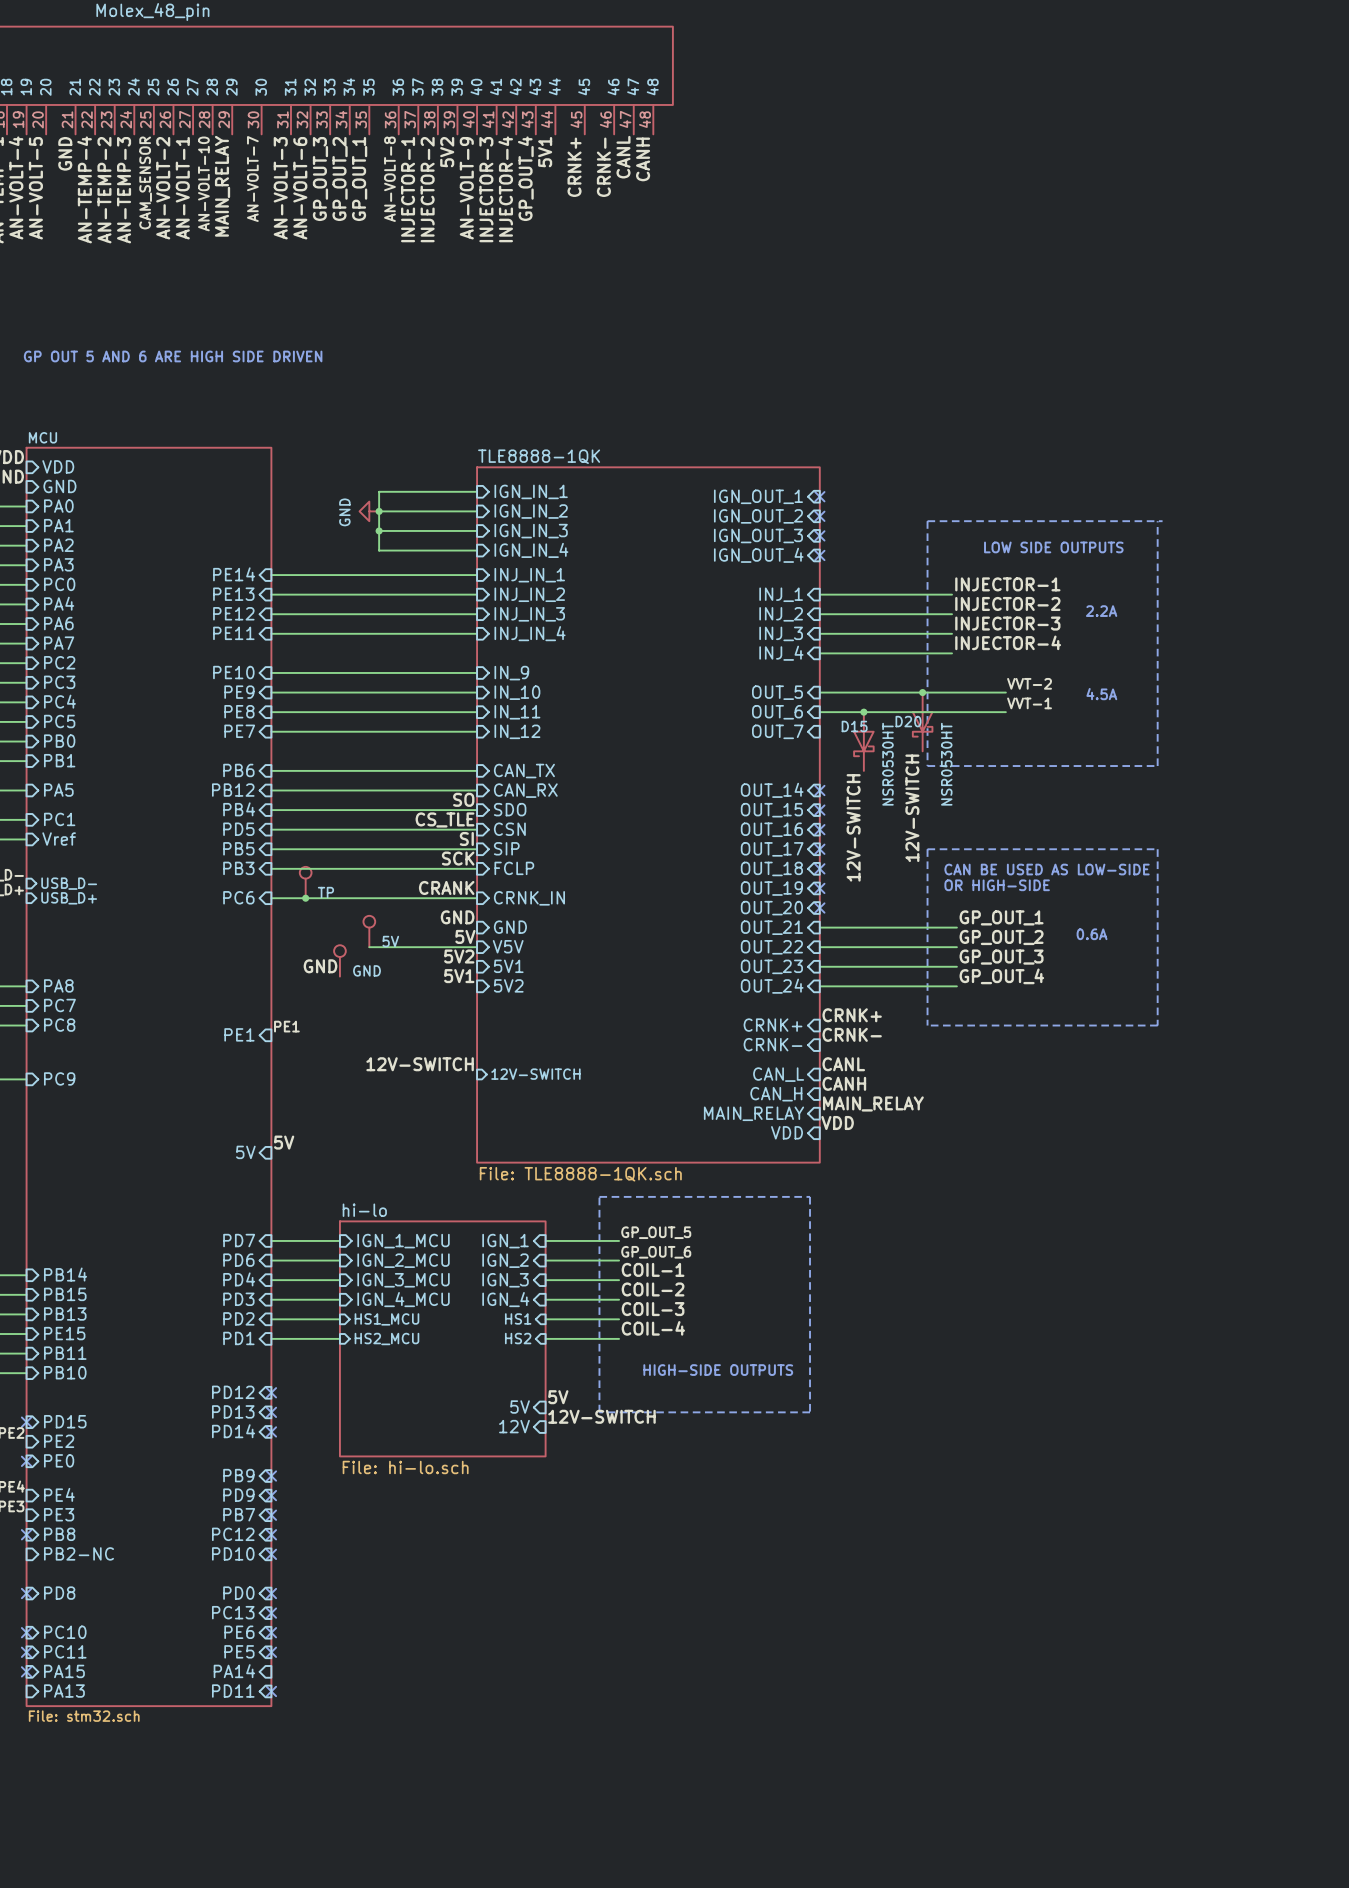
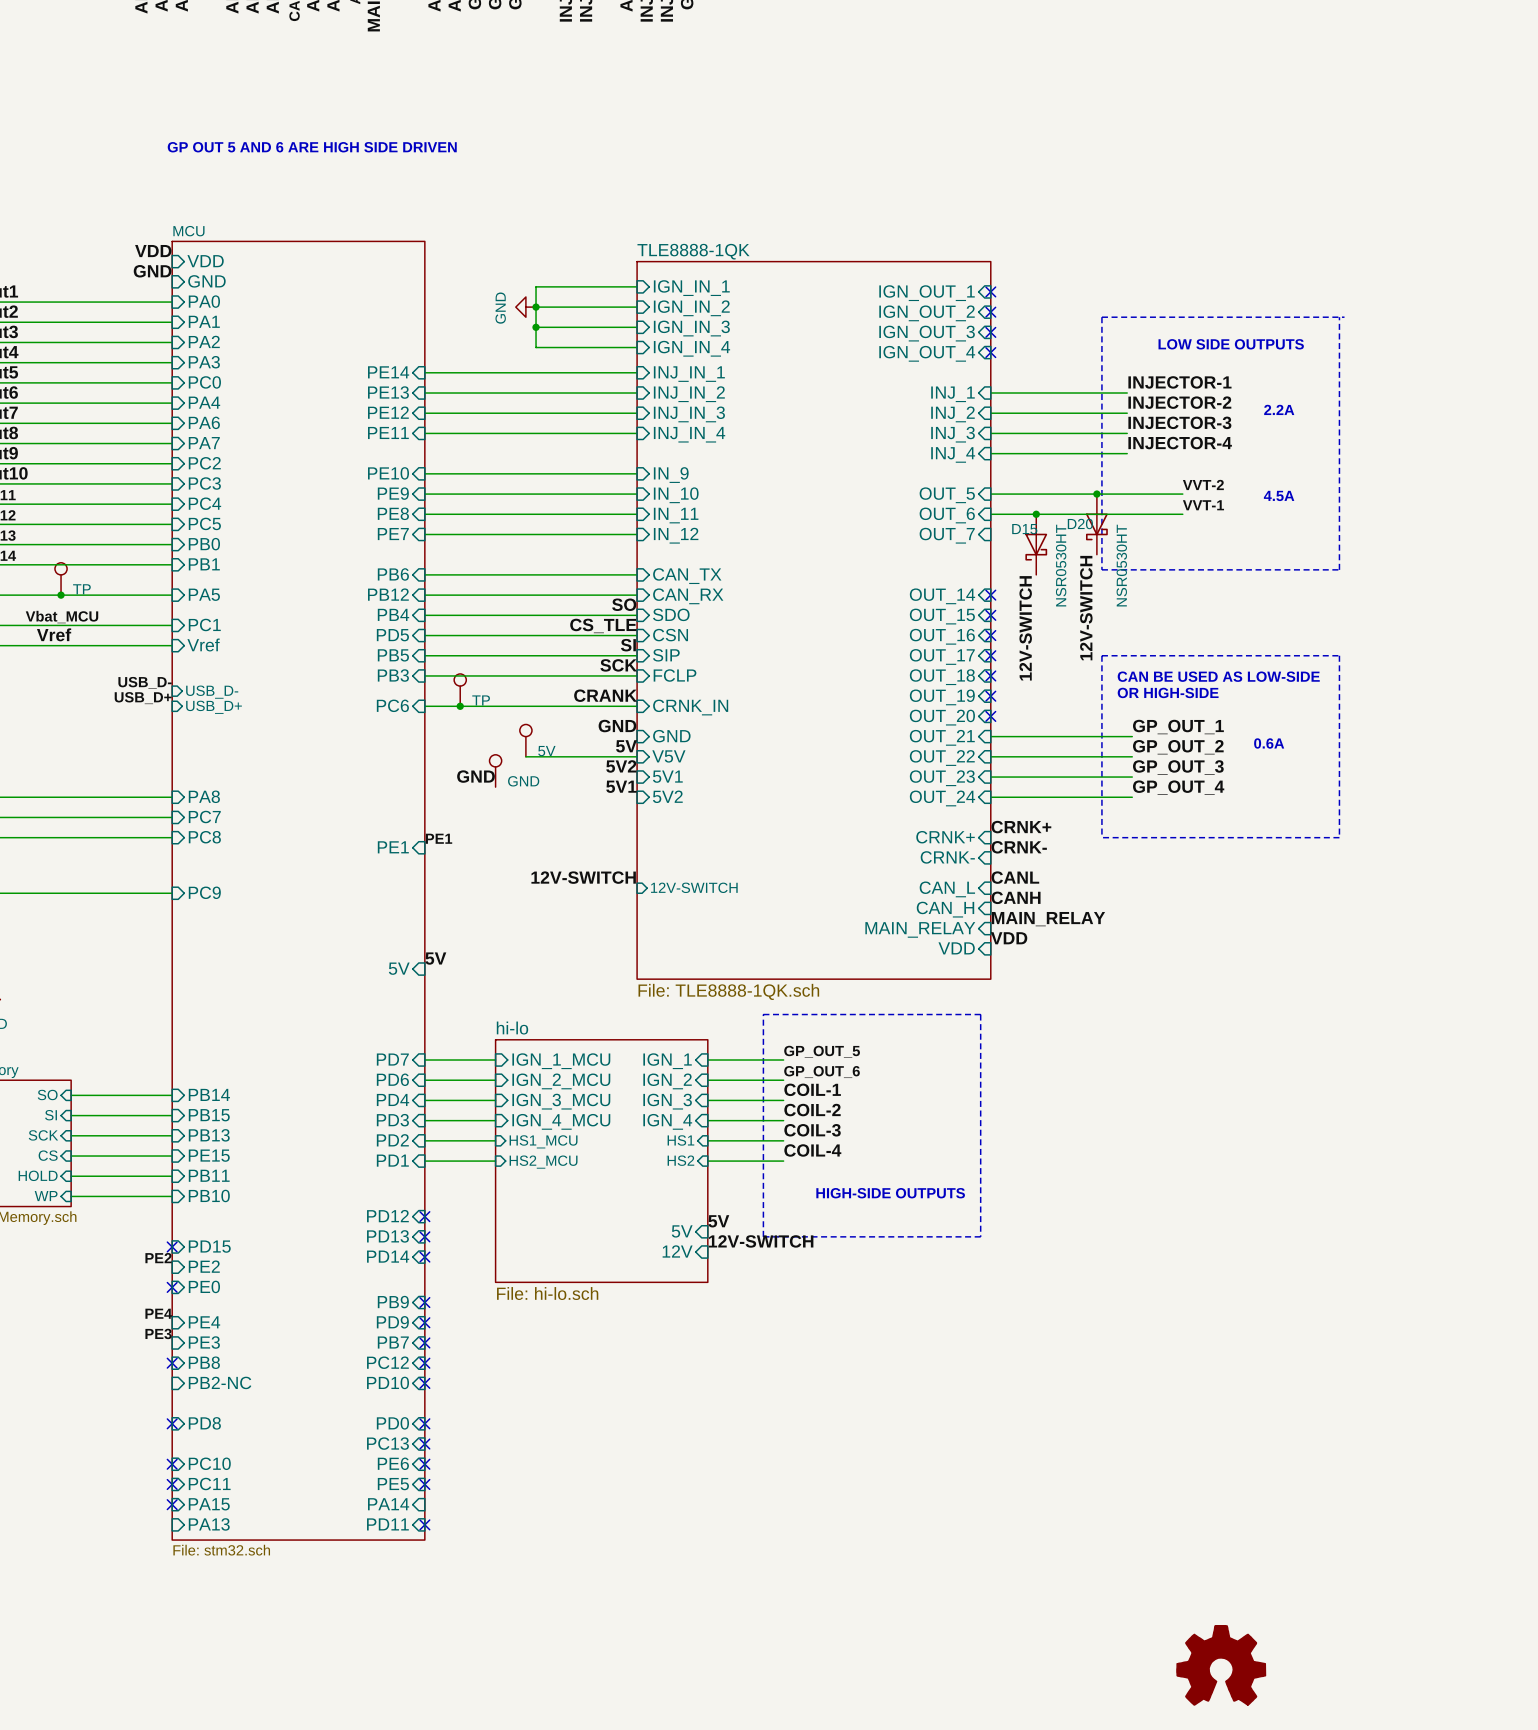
part: none -> (1221, 1665)

